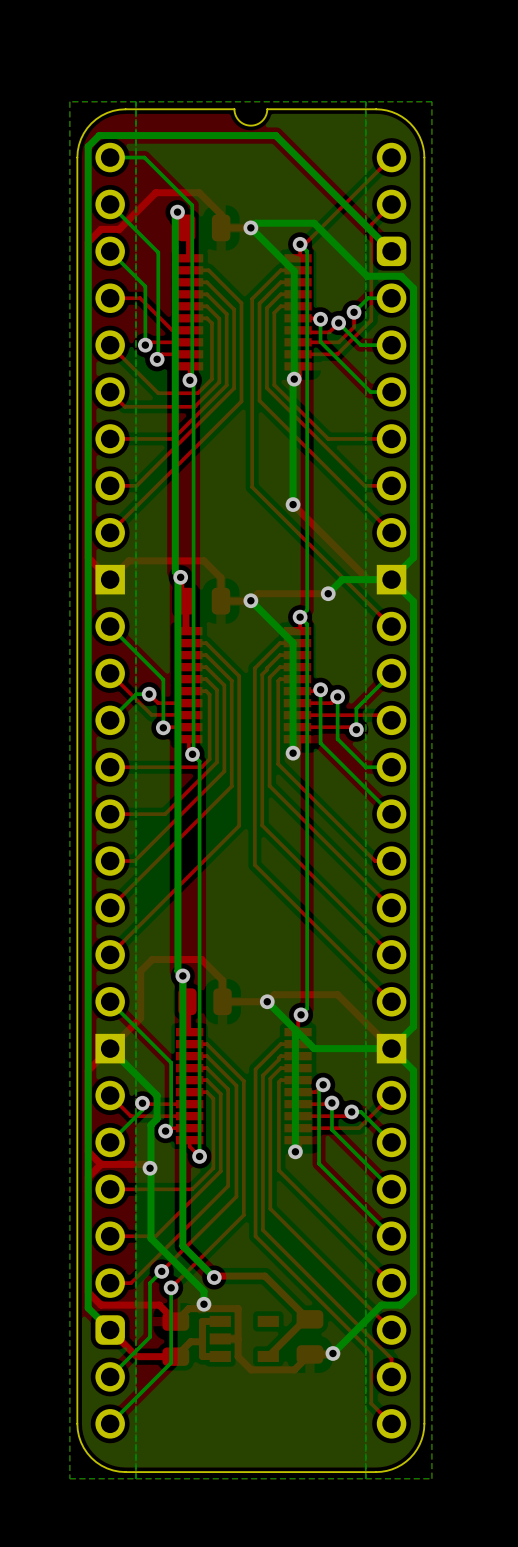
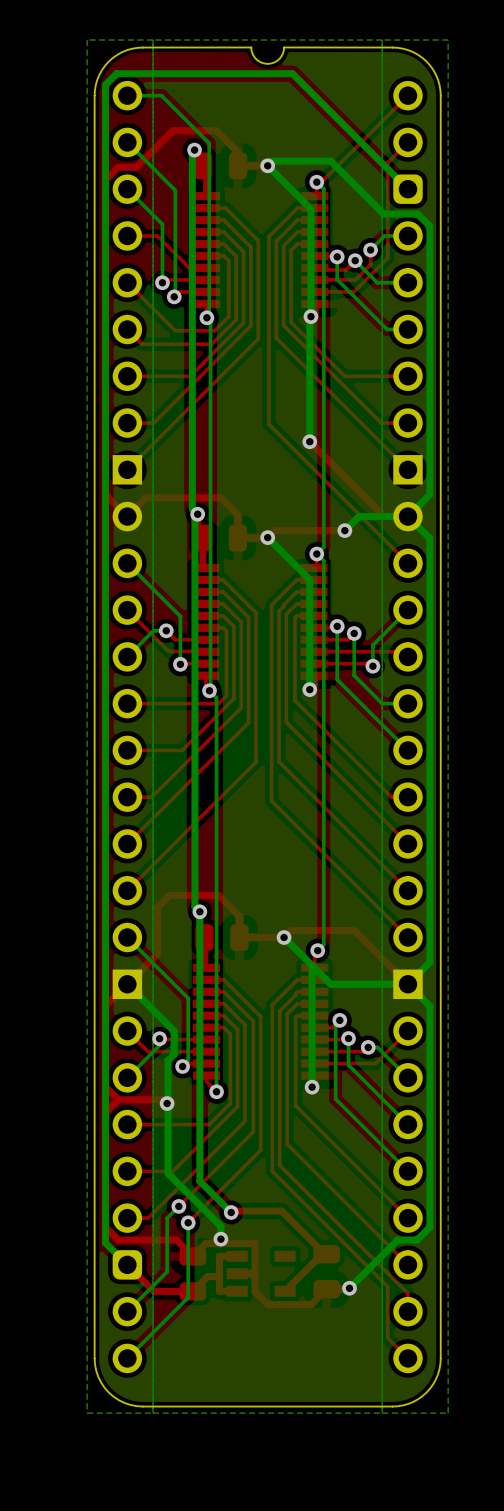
part footprint: [76, 108, 426, 1474] -> [93, 46, 442, 1408]

